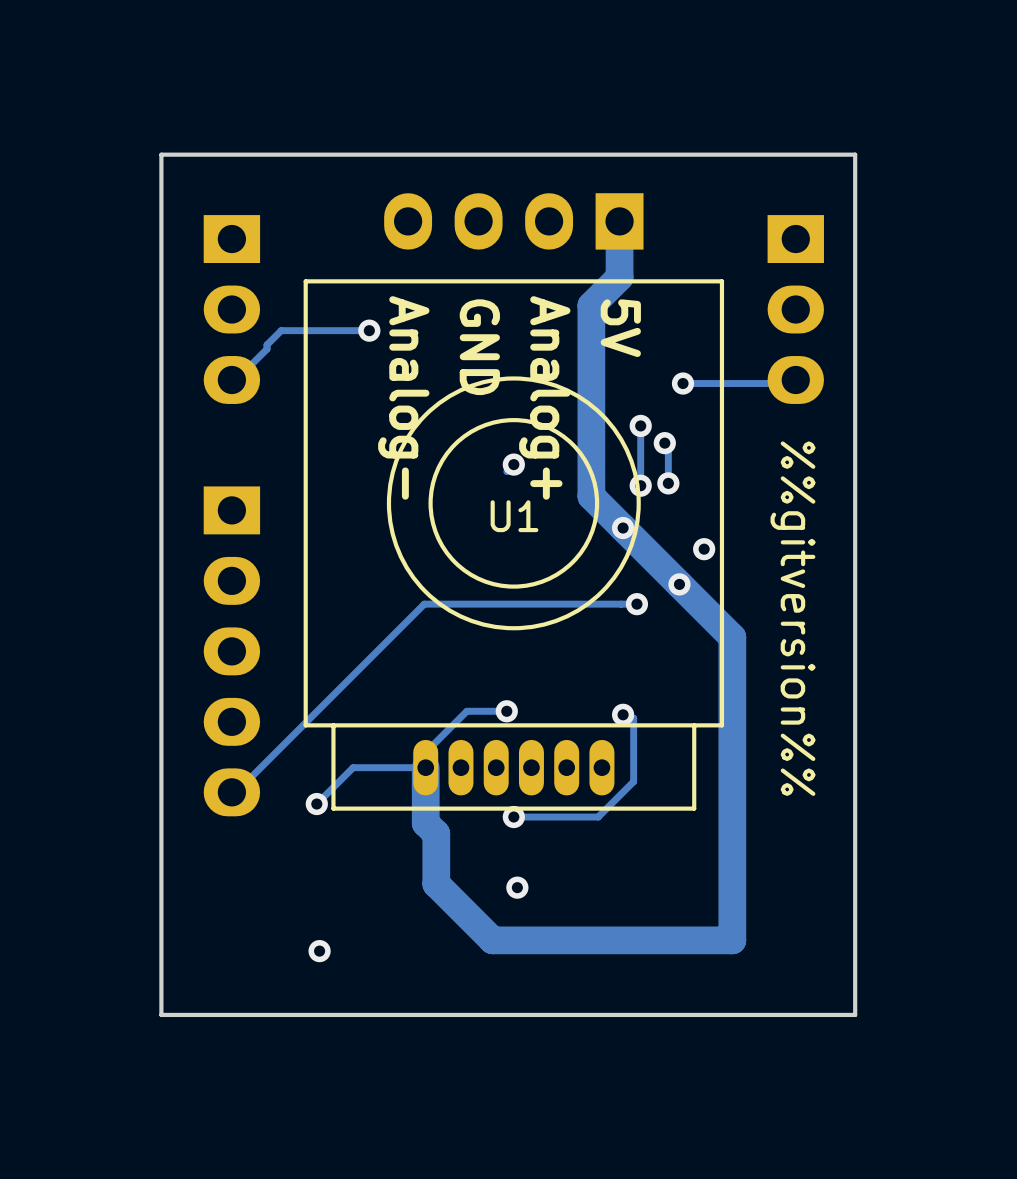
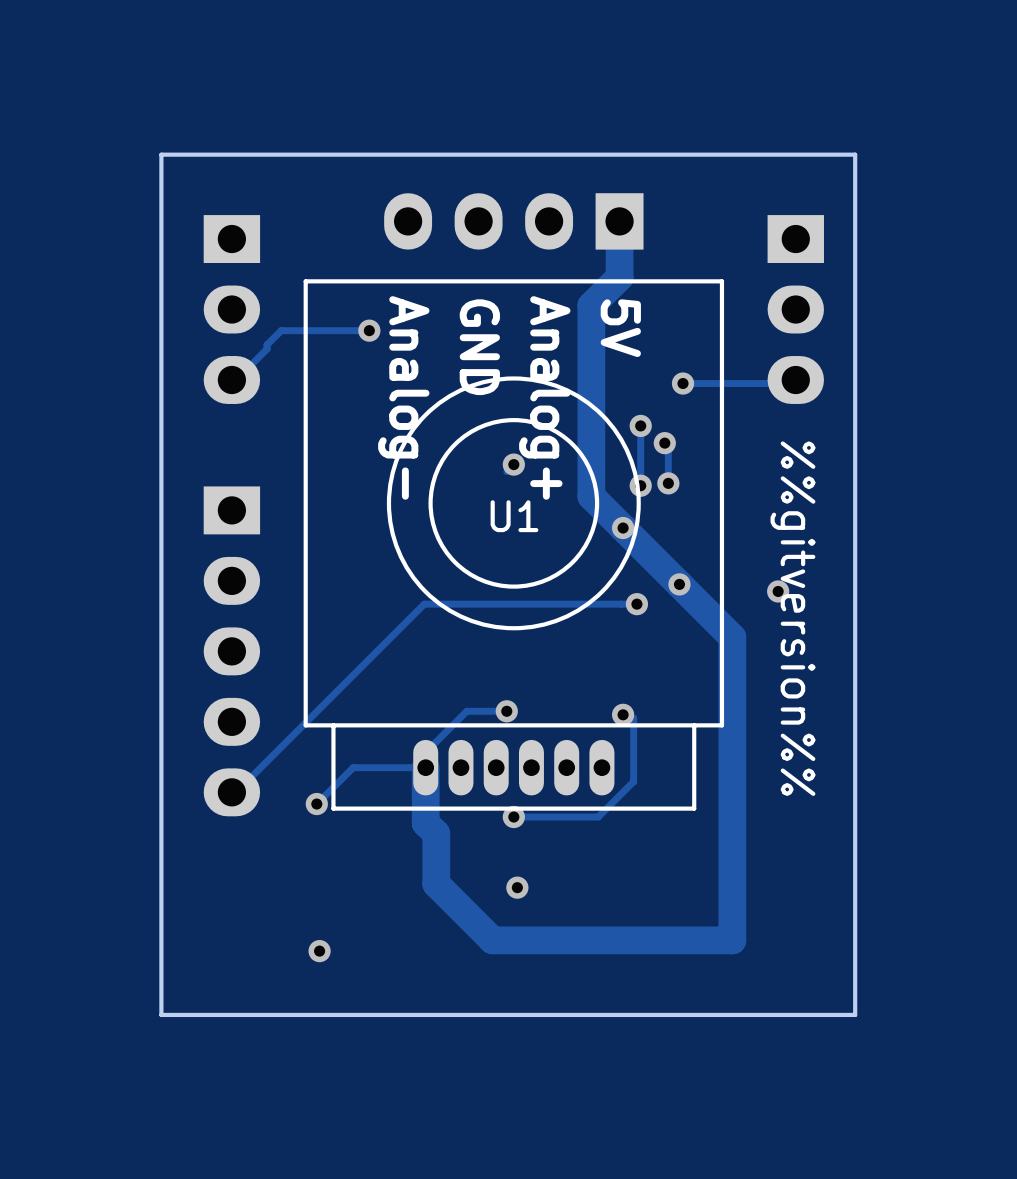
via position: (704, 549) -> (778, 591)

